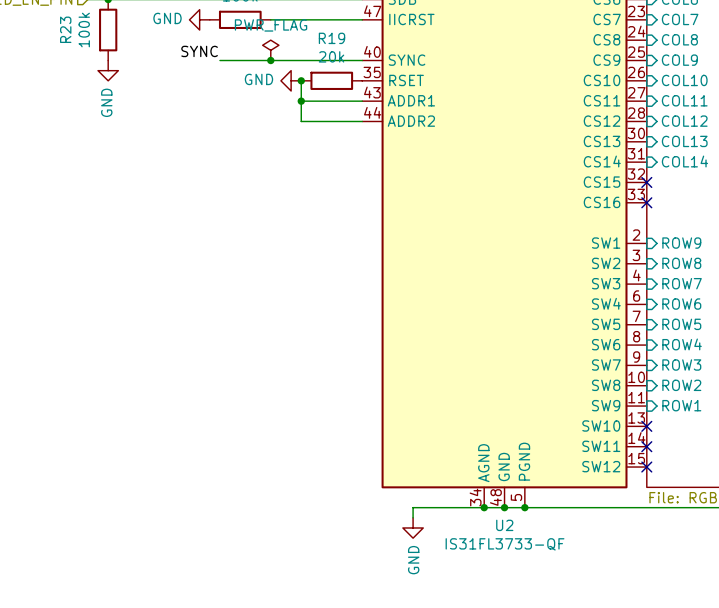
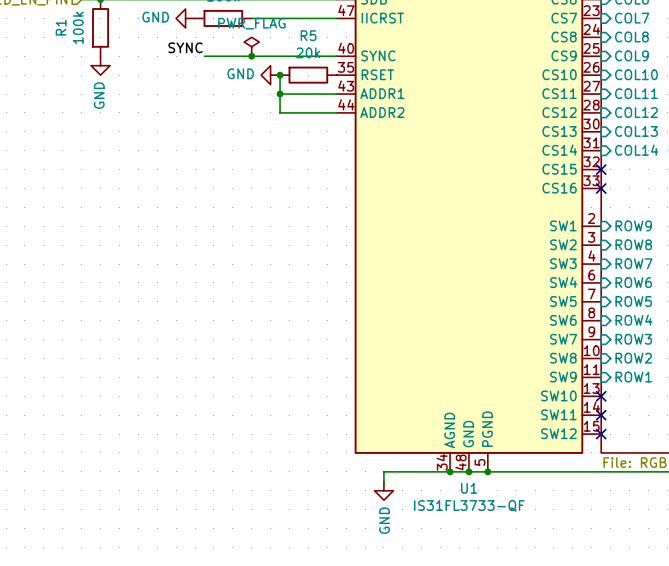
R23 name: R23 (65, 29) -> R1 (61, 27)
R19 name: R19 (332, 38) -> R5 (308, 35)
U2 name: U2 (504, 525) -> U1 (469, 488)

